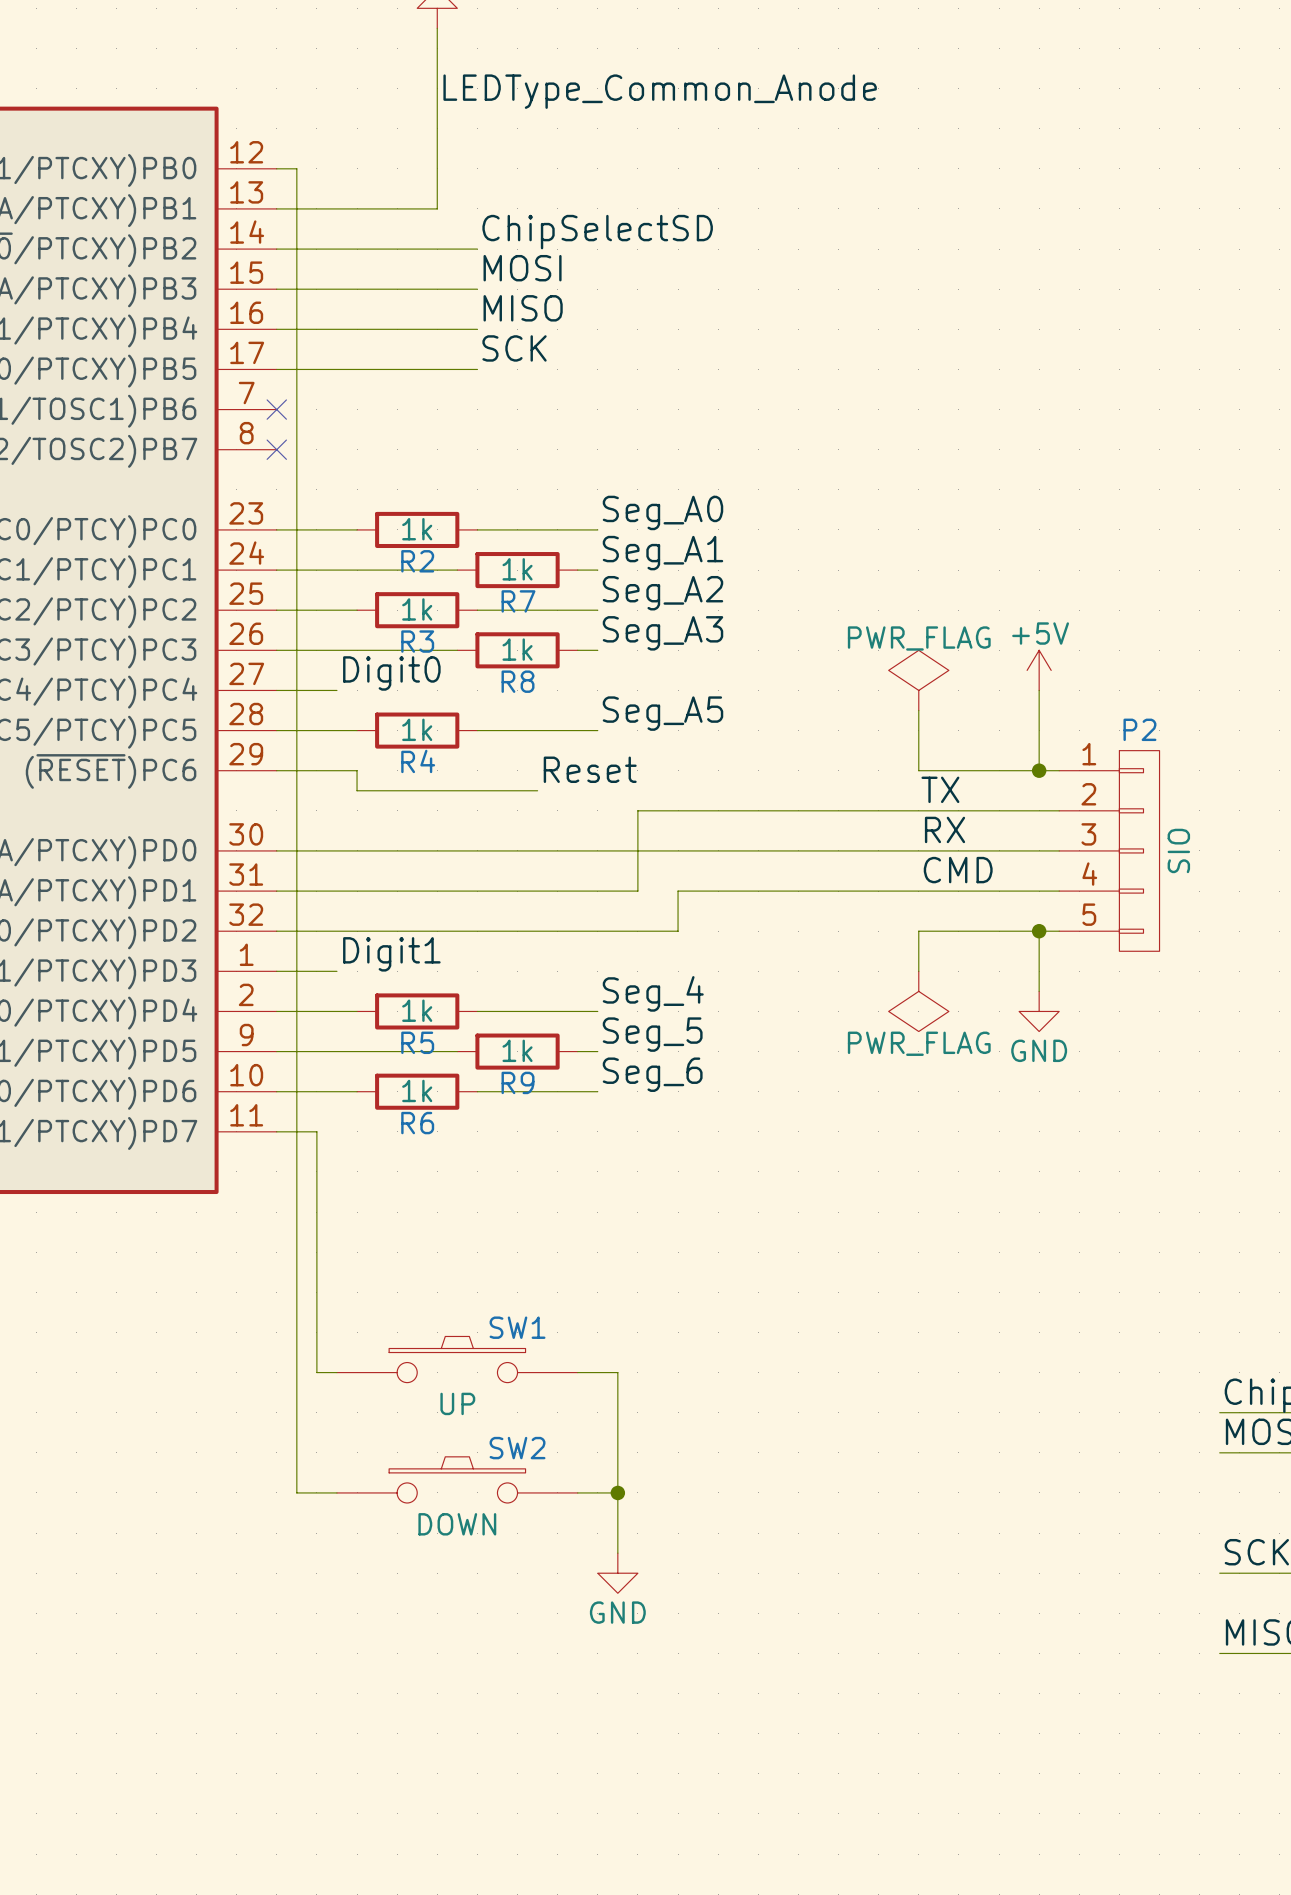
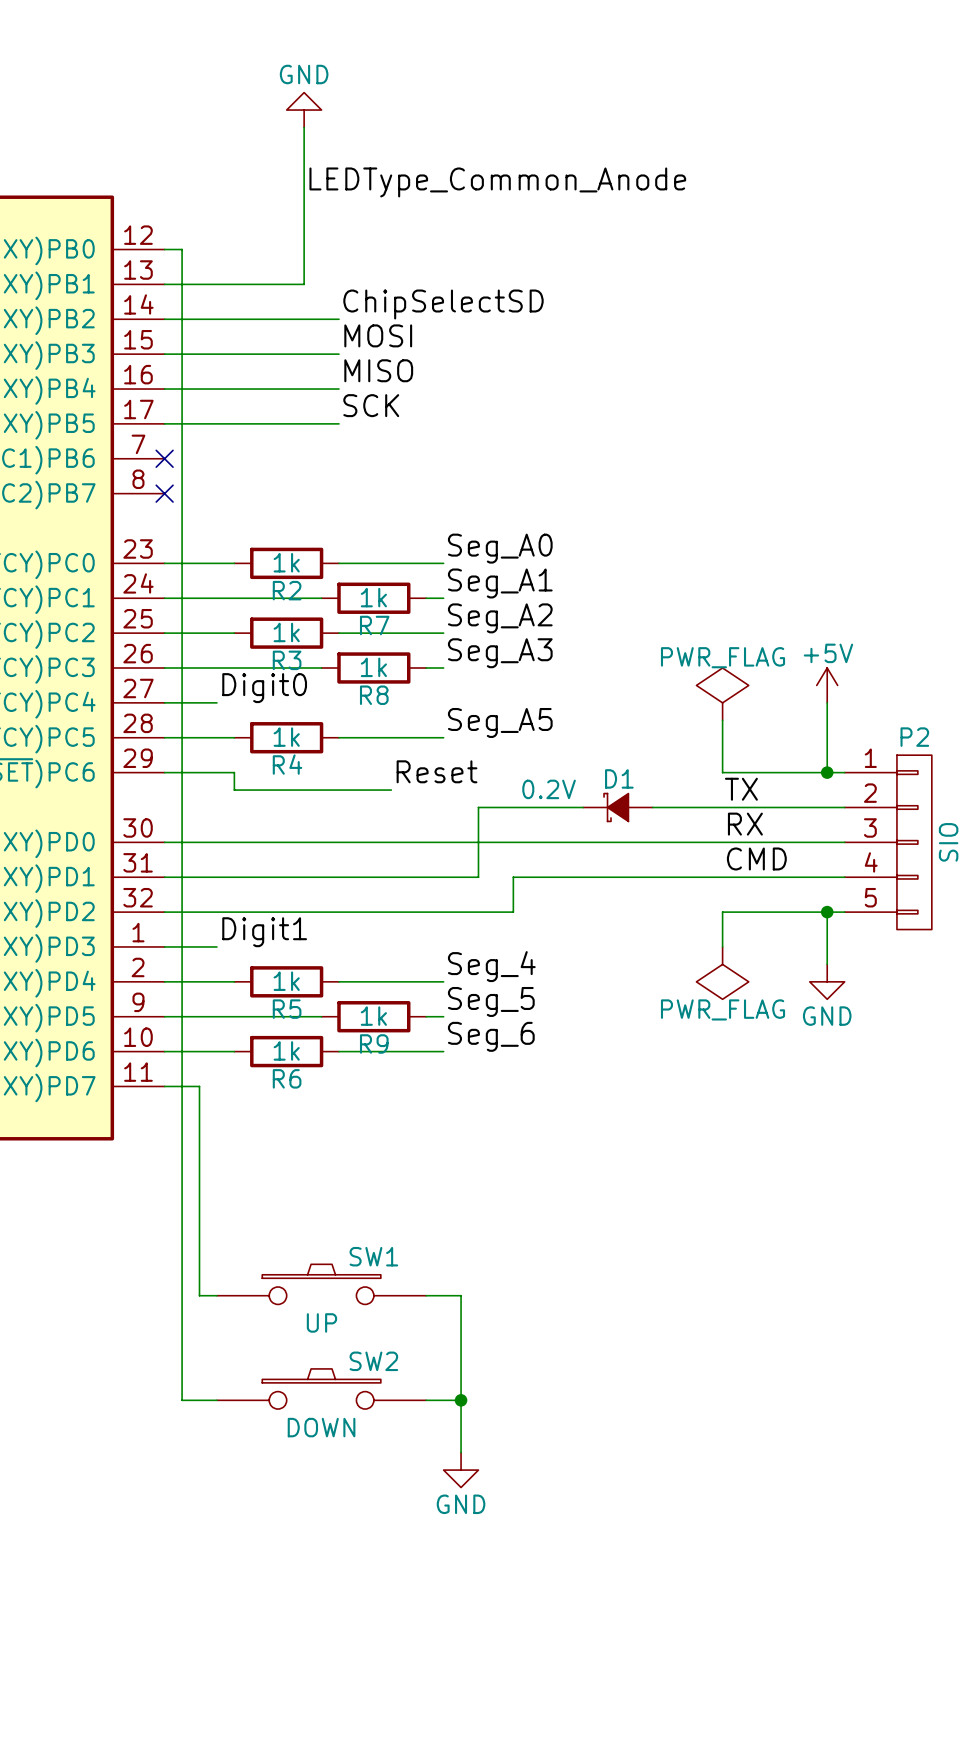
D1: none -> 0.2V (617, 807)

